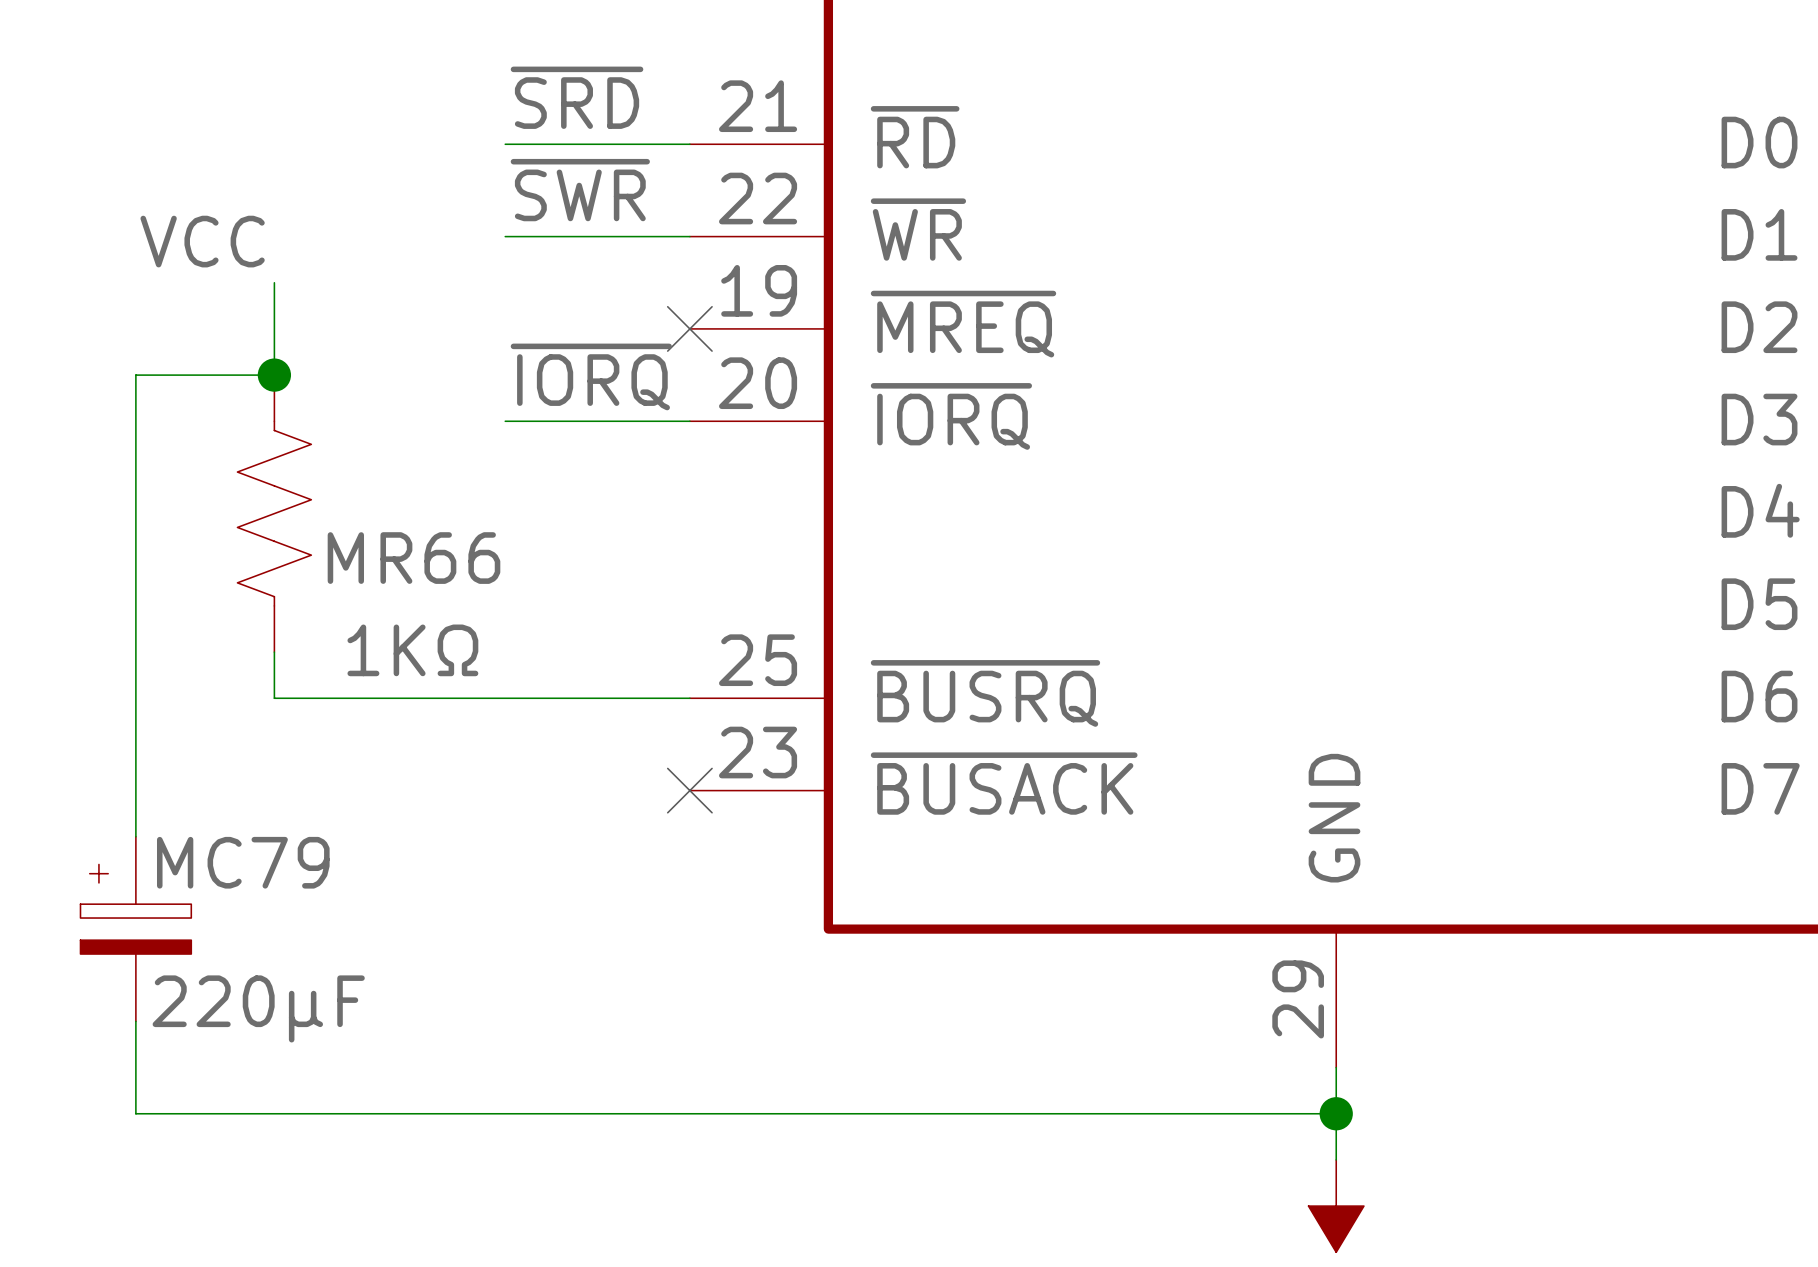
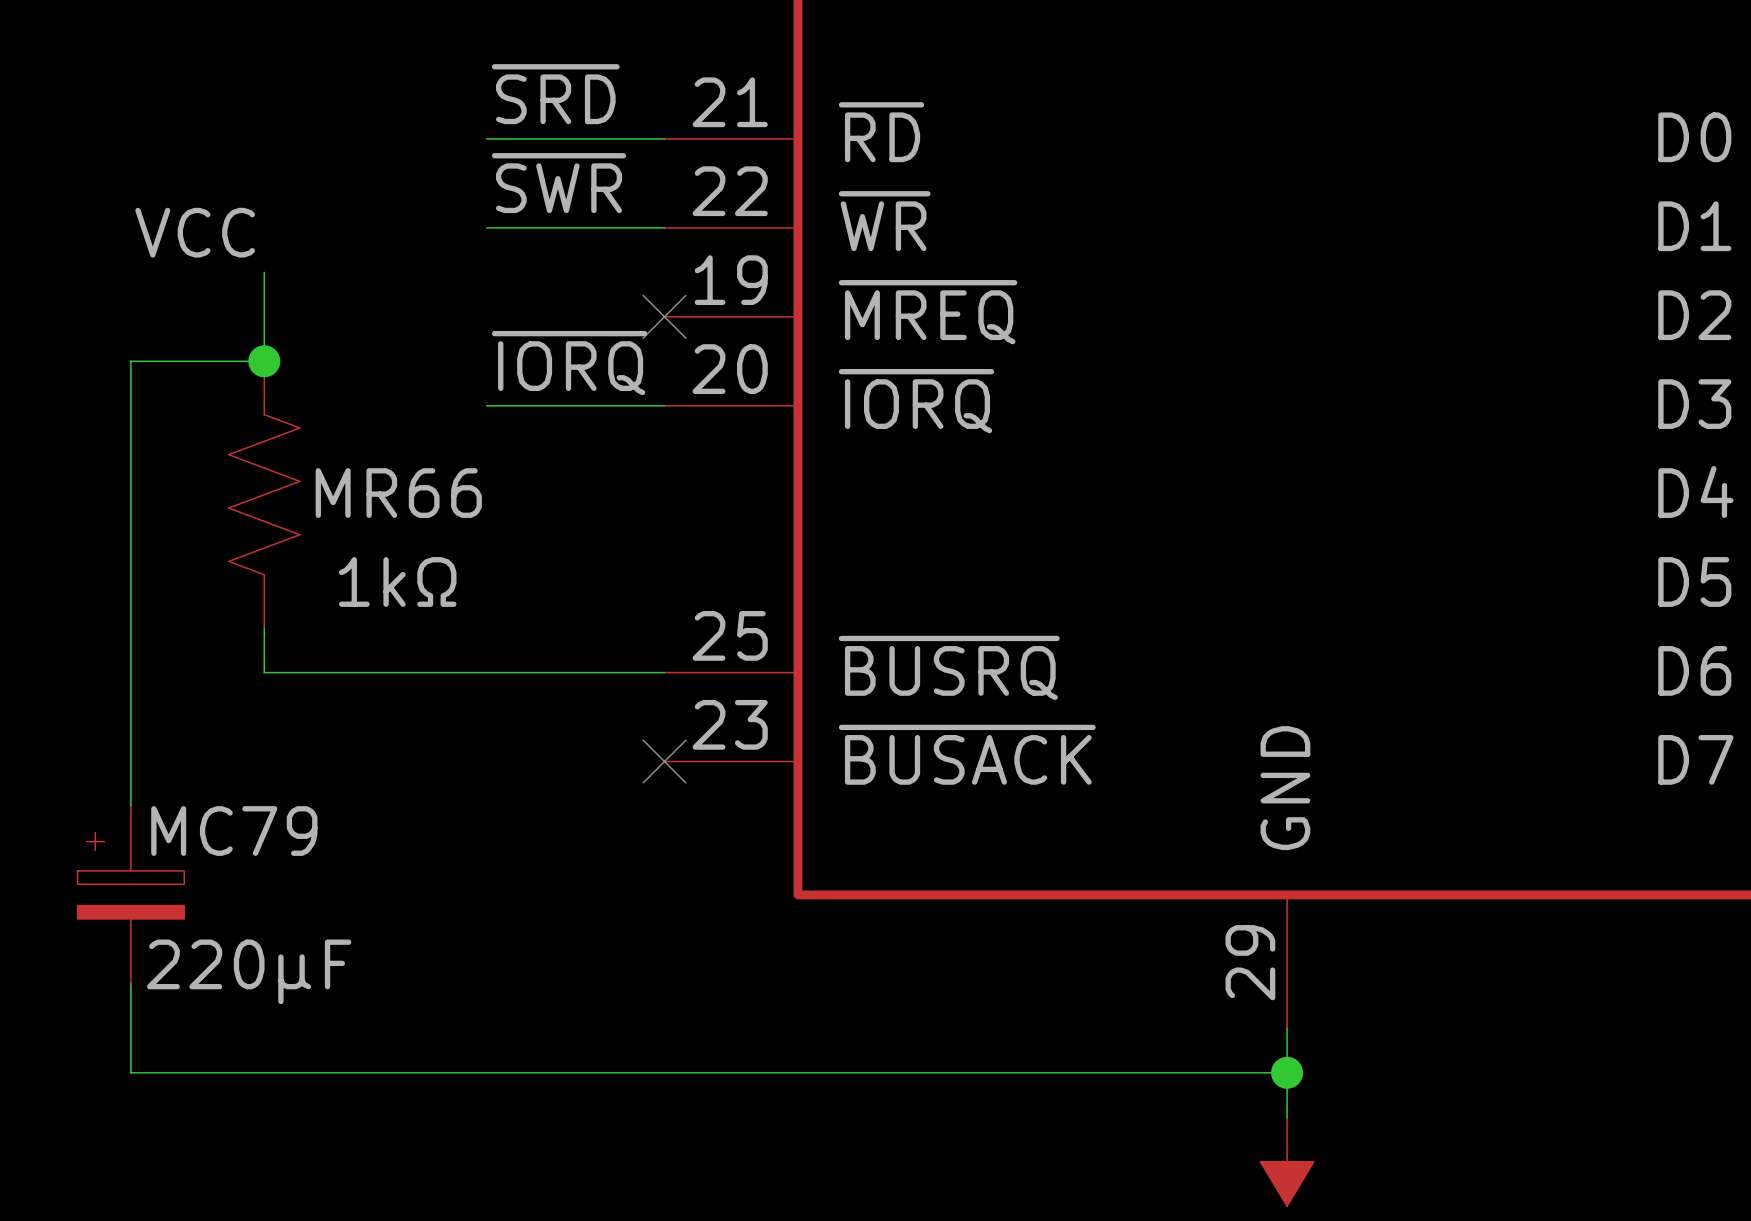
MR66 name position: MR66 (413, 558) -> MR66 (398, 493)
MR66 value: 1KΩ (412, 650) -> 1kΩ (397, 581)

